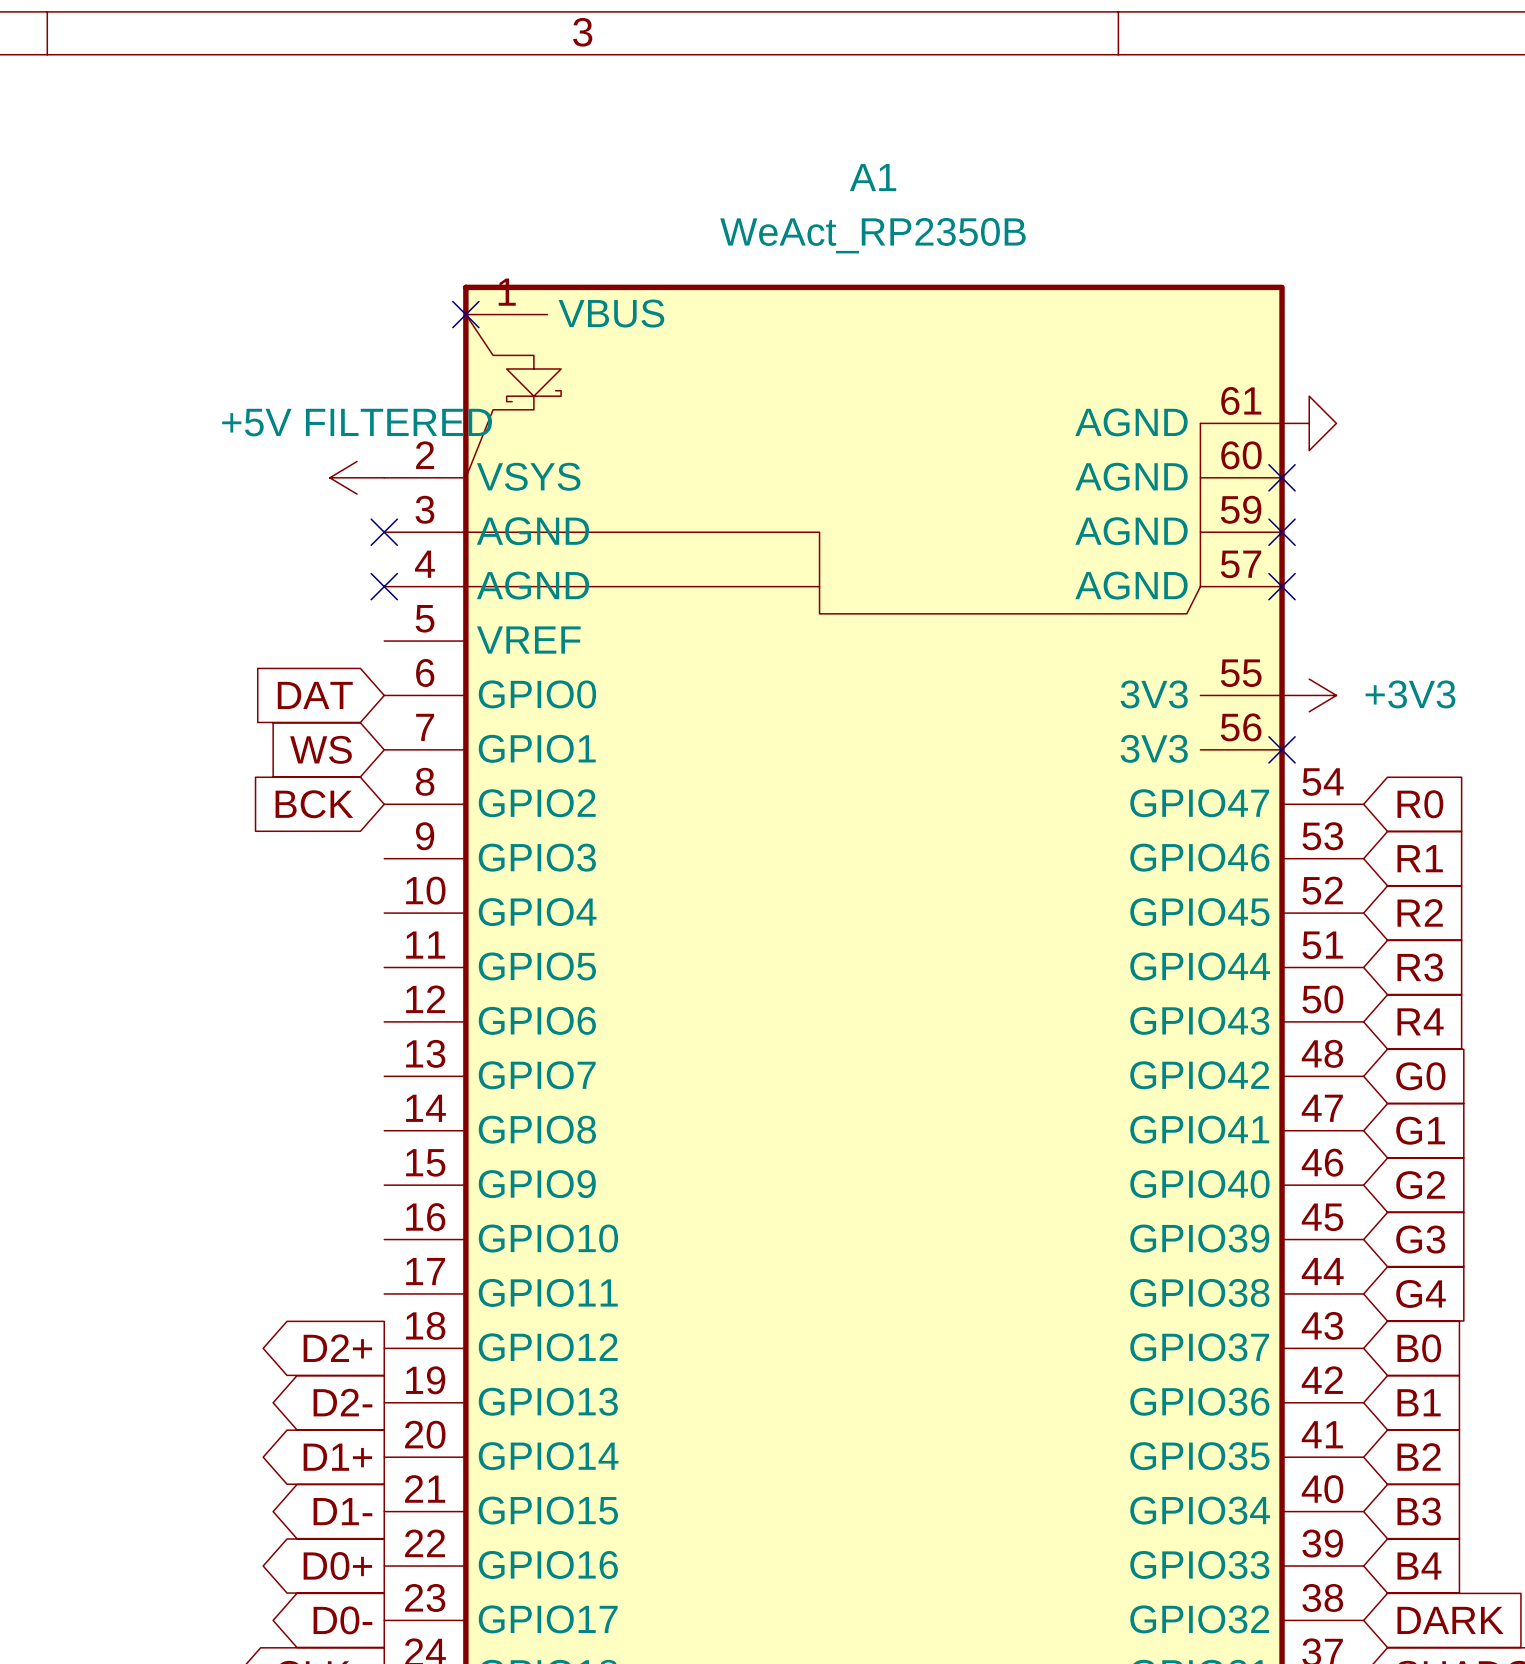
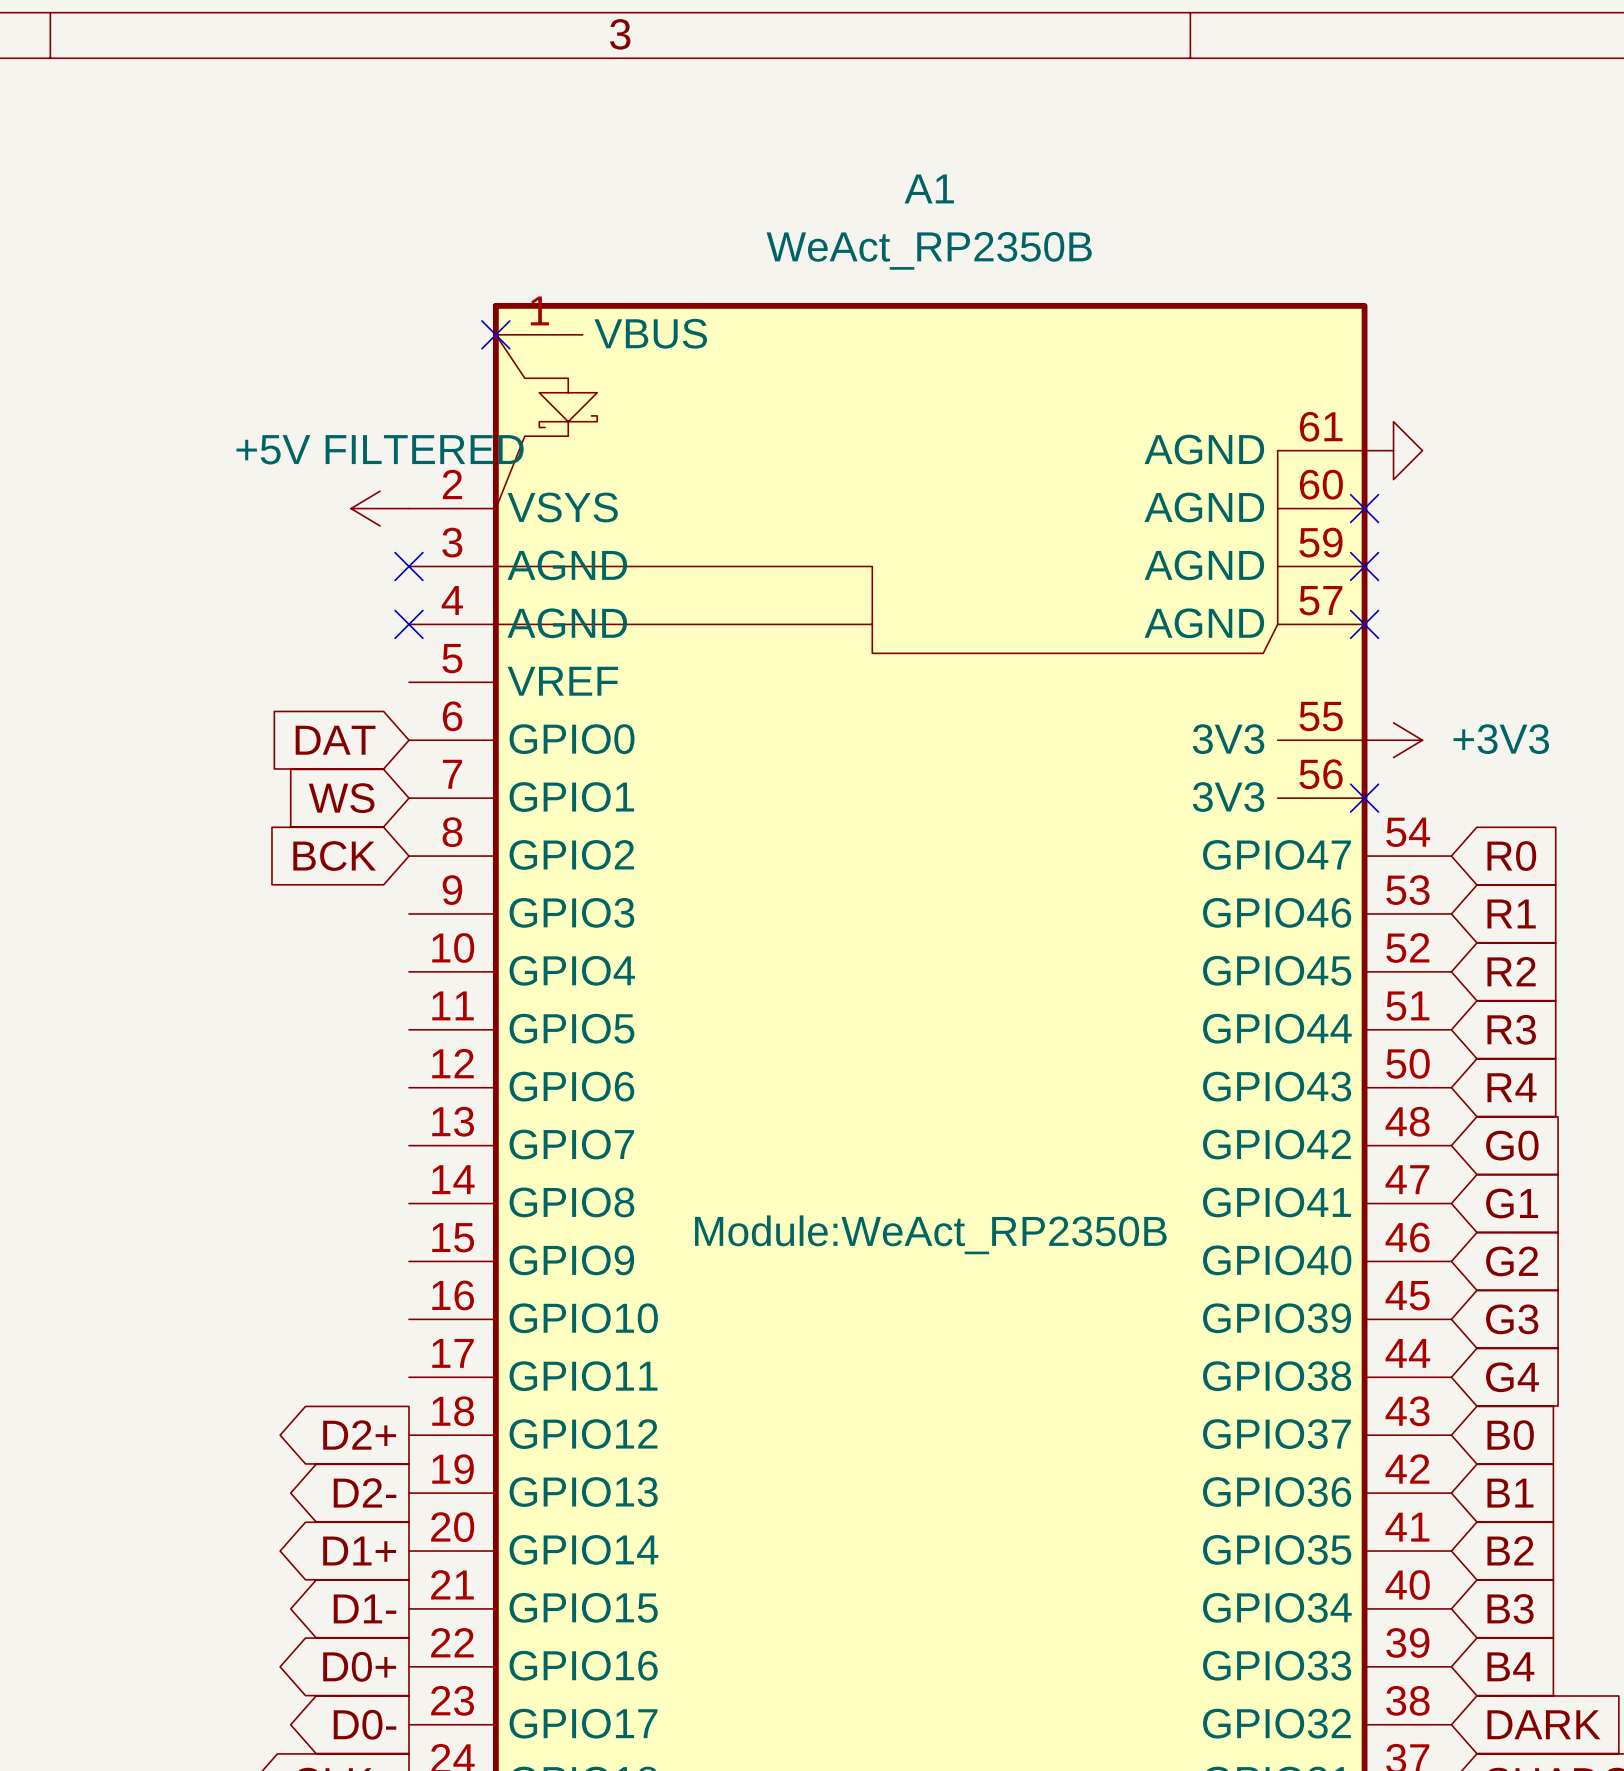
A1 text: none -> Module:WeAct_RP2350B (930, 1234)

